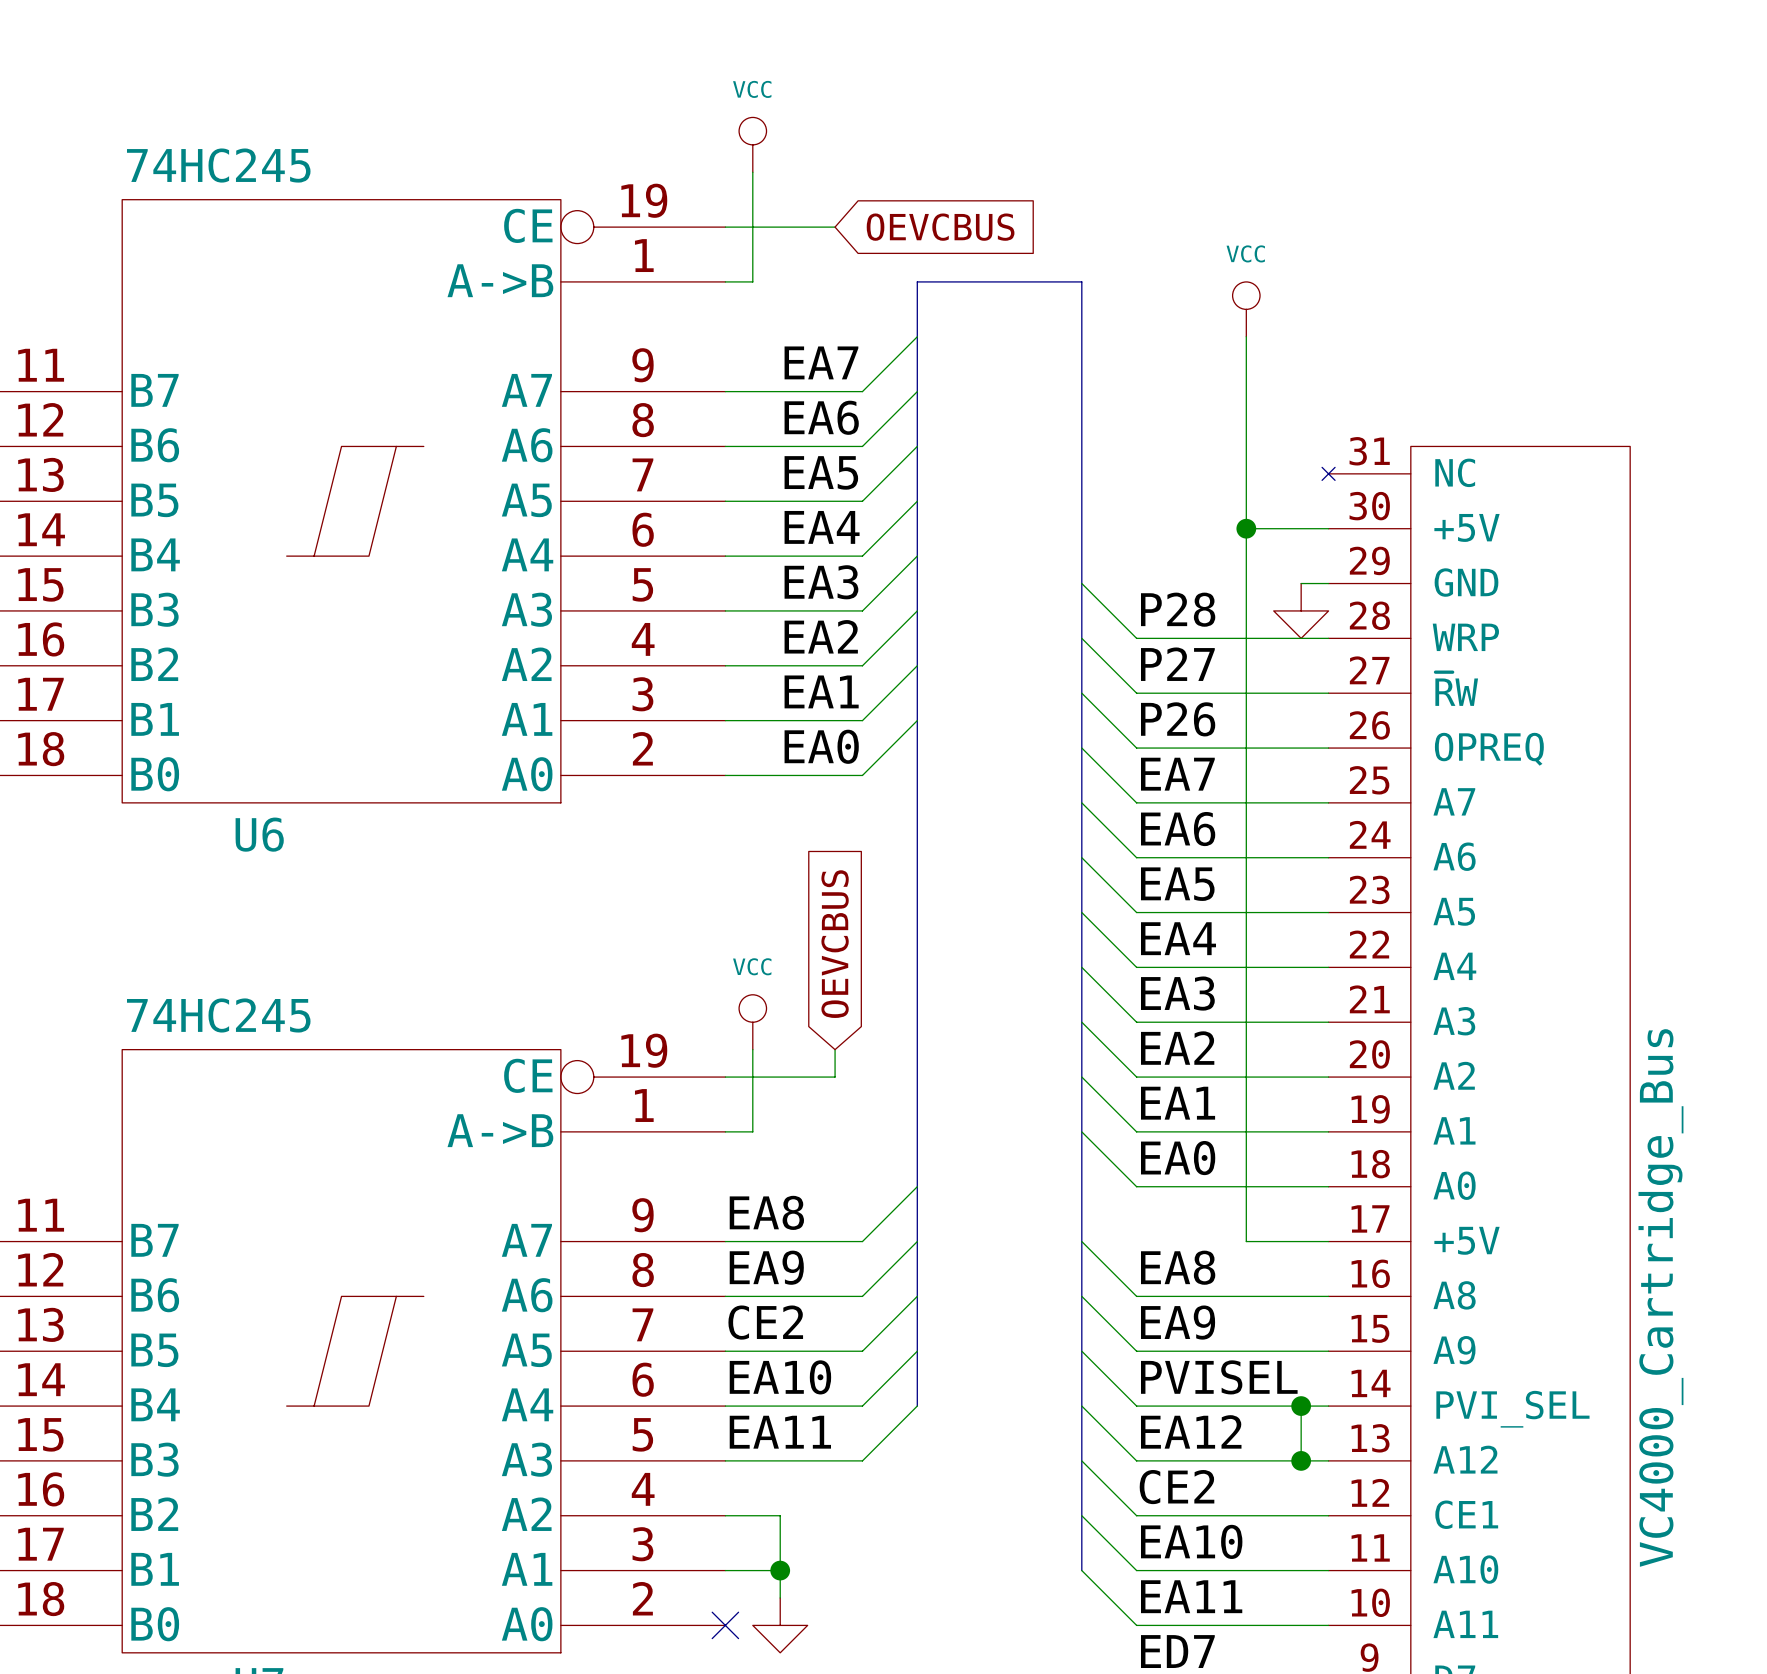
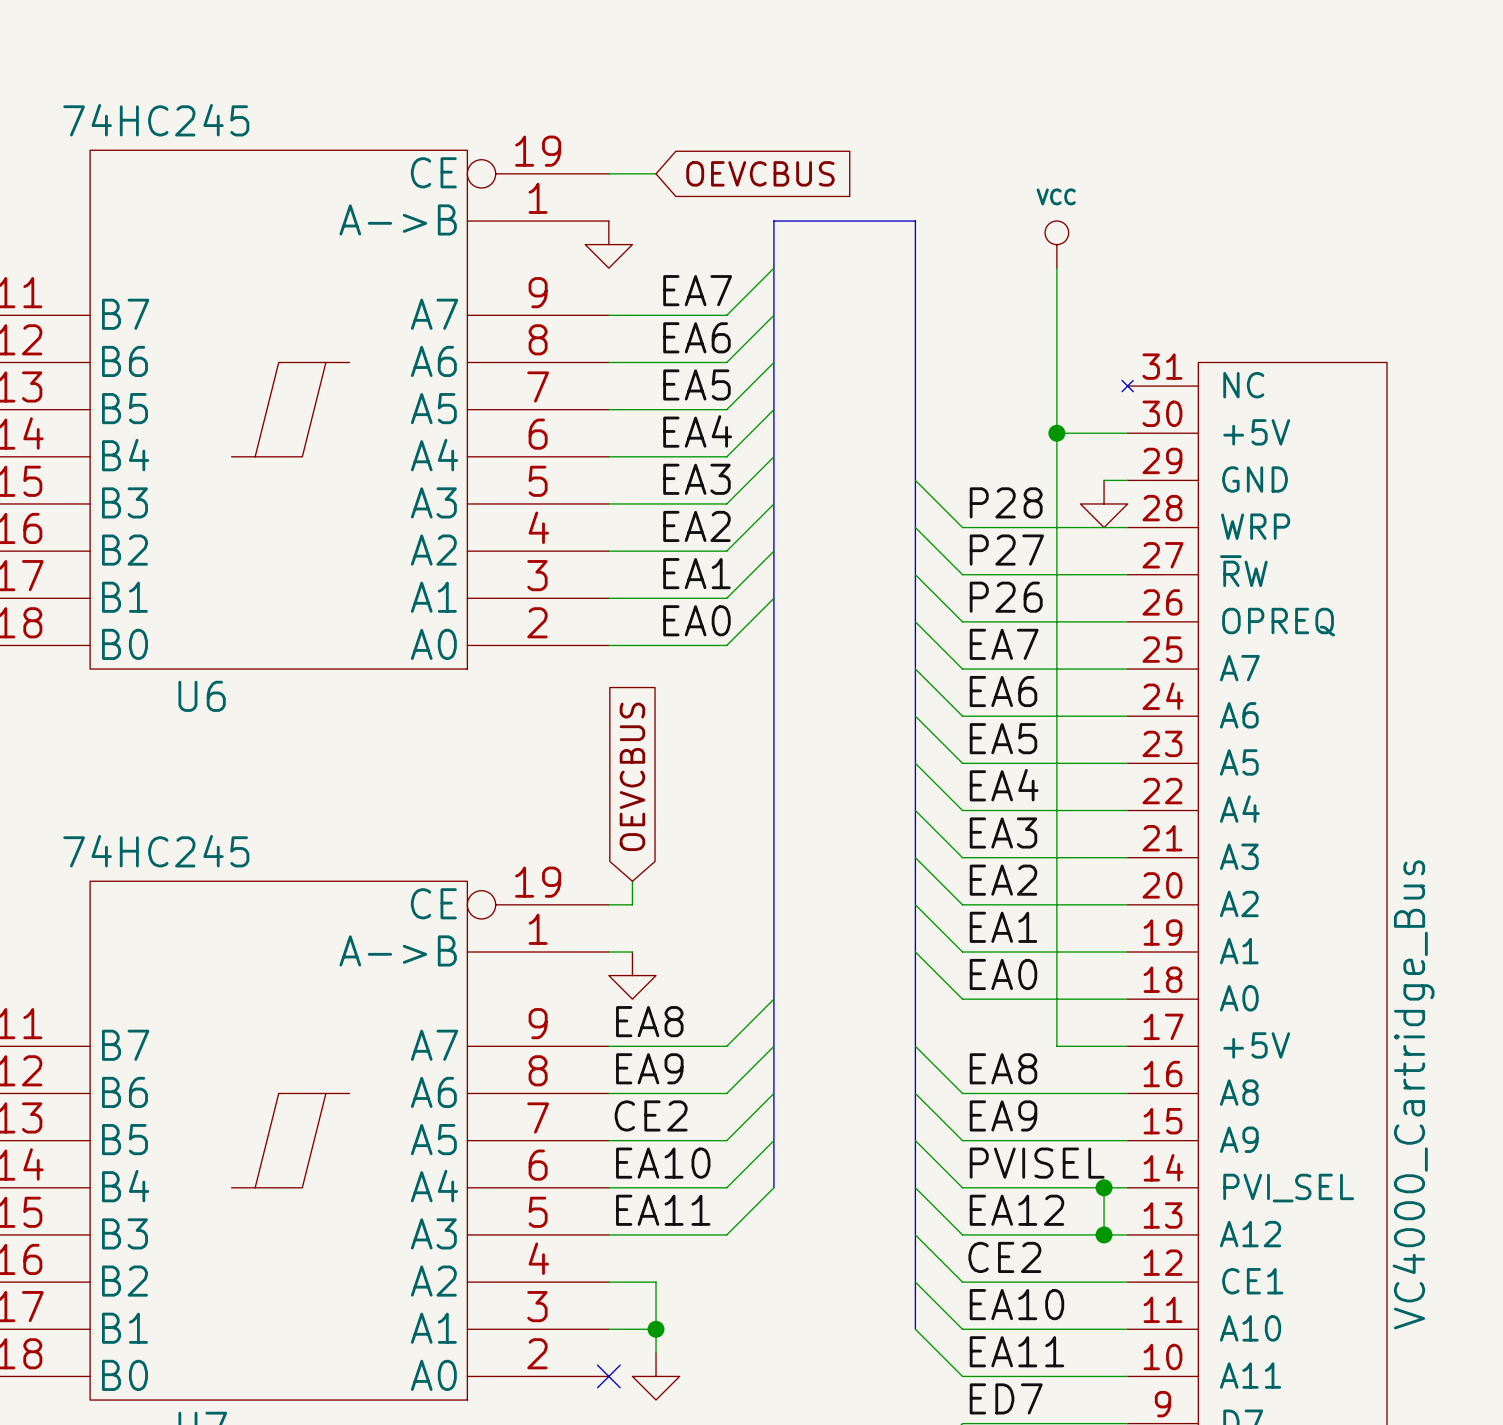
power symbol: VCC (752, 144) -> none
wire: (752, 172) (752, 281) (725, 281) -> none
wire: (780, 227) (835, 227) -> none
global label position: OEVCBUS (940, 227) -> OEVCBUS (760, 173)
power symbol: none -> (608, 244)
global label position: OEVCBUS (835, 944) -> OEVCBUS (632, 776)
power symbol: VCC (752, 1022) -> none
wire: (835, 1049) (835, 1077) (752, 1077) (752, 1131) -> none
power symbol: none -> (632, 975)

